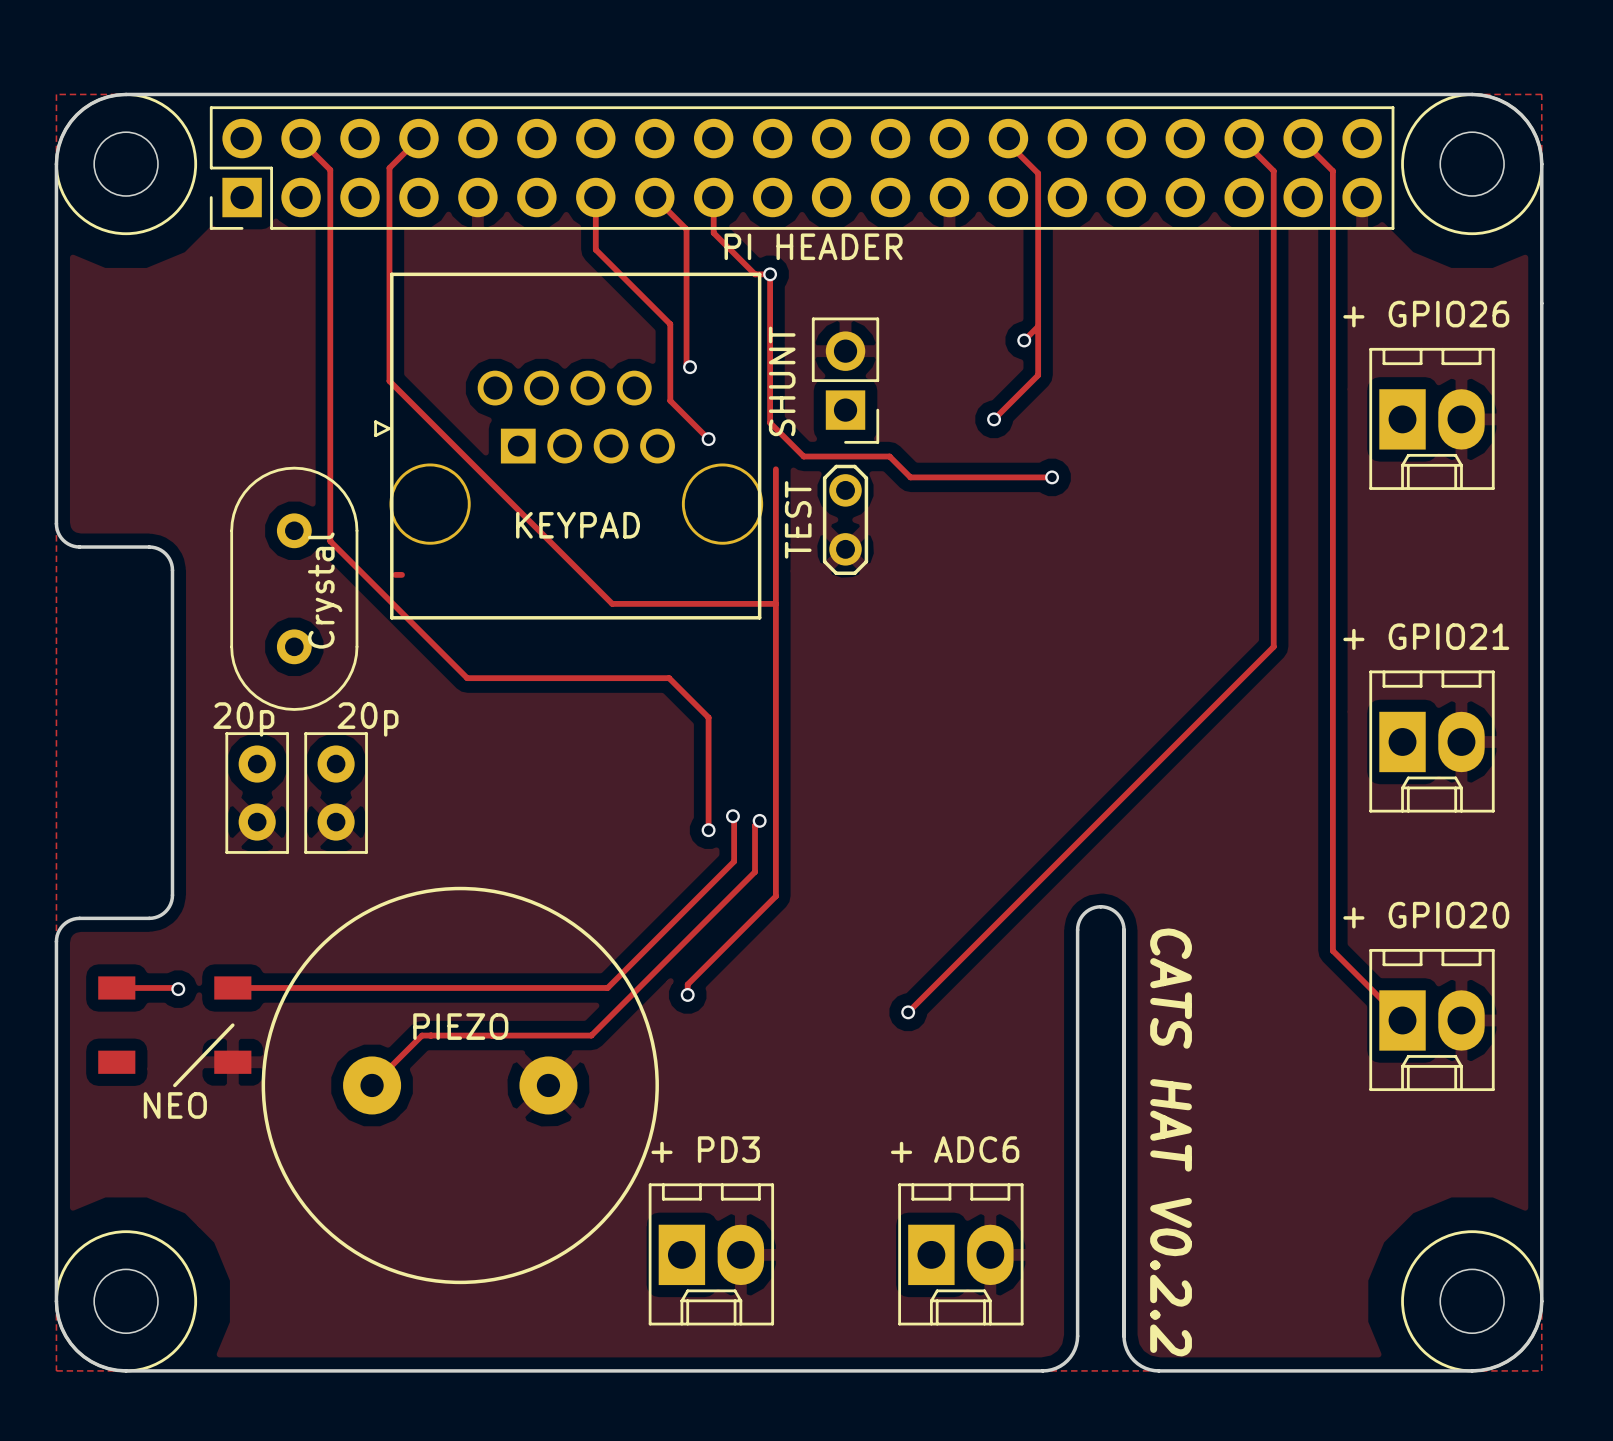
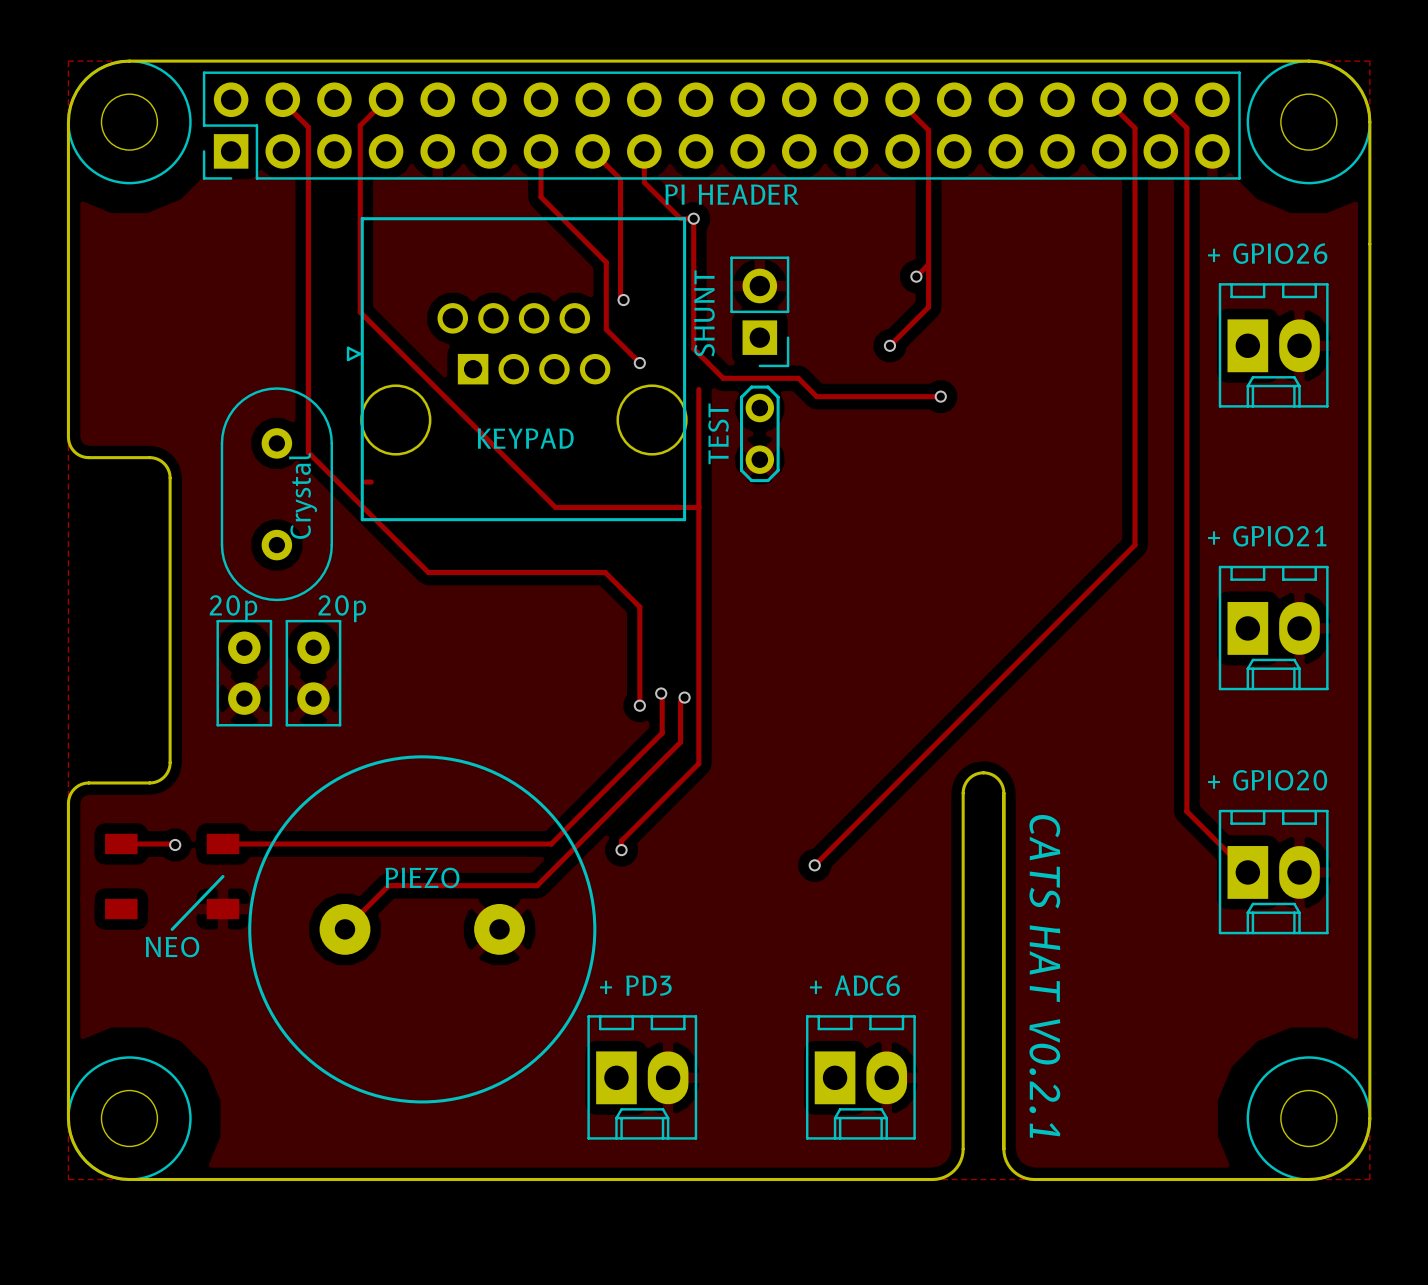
text: CATS HAT V0.2.2 (1171, 1142) -> CATS HAT V0.2.1 (1044, 976)

